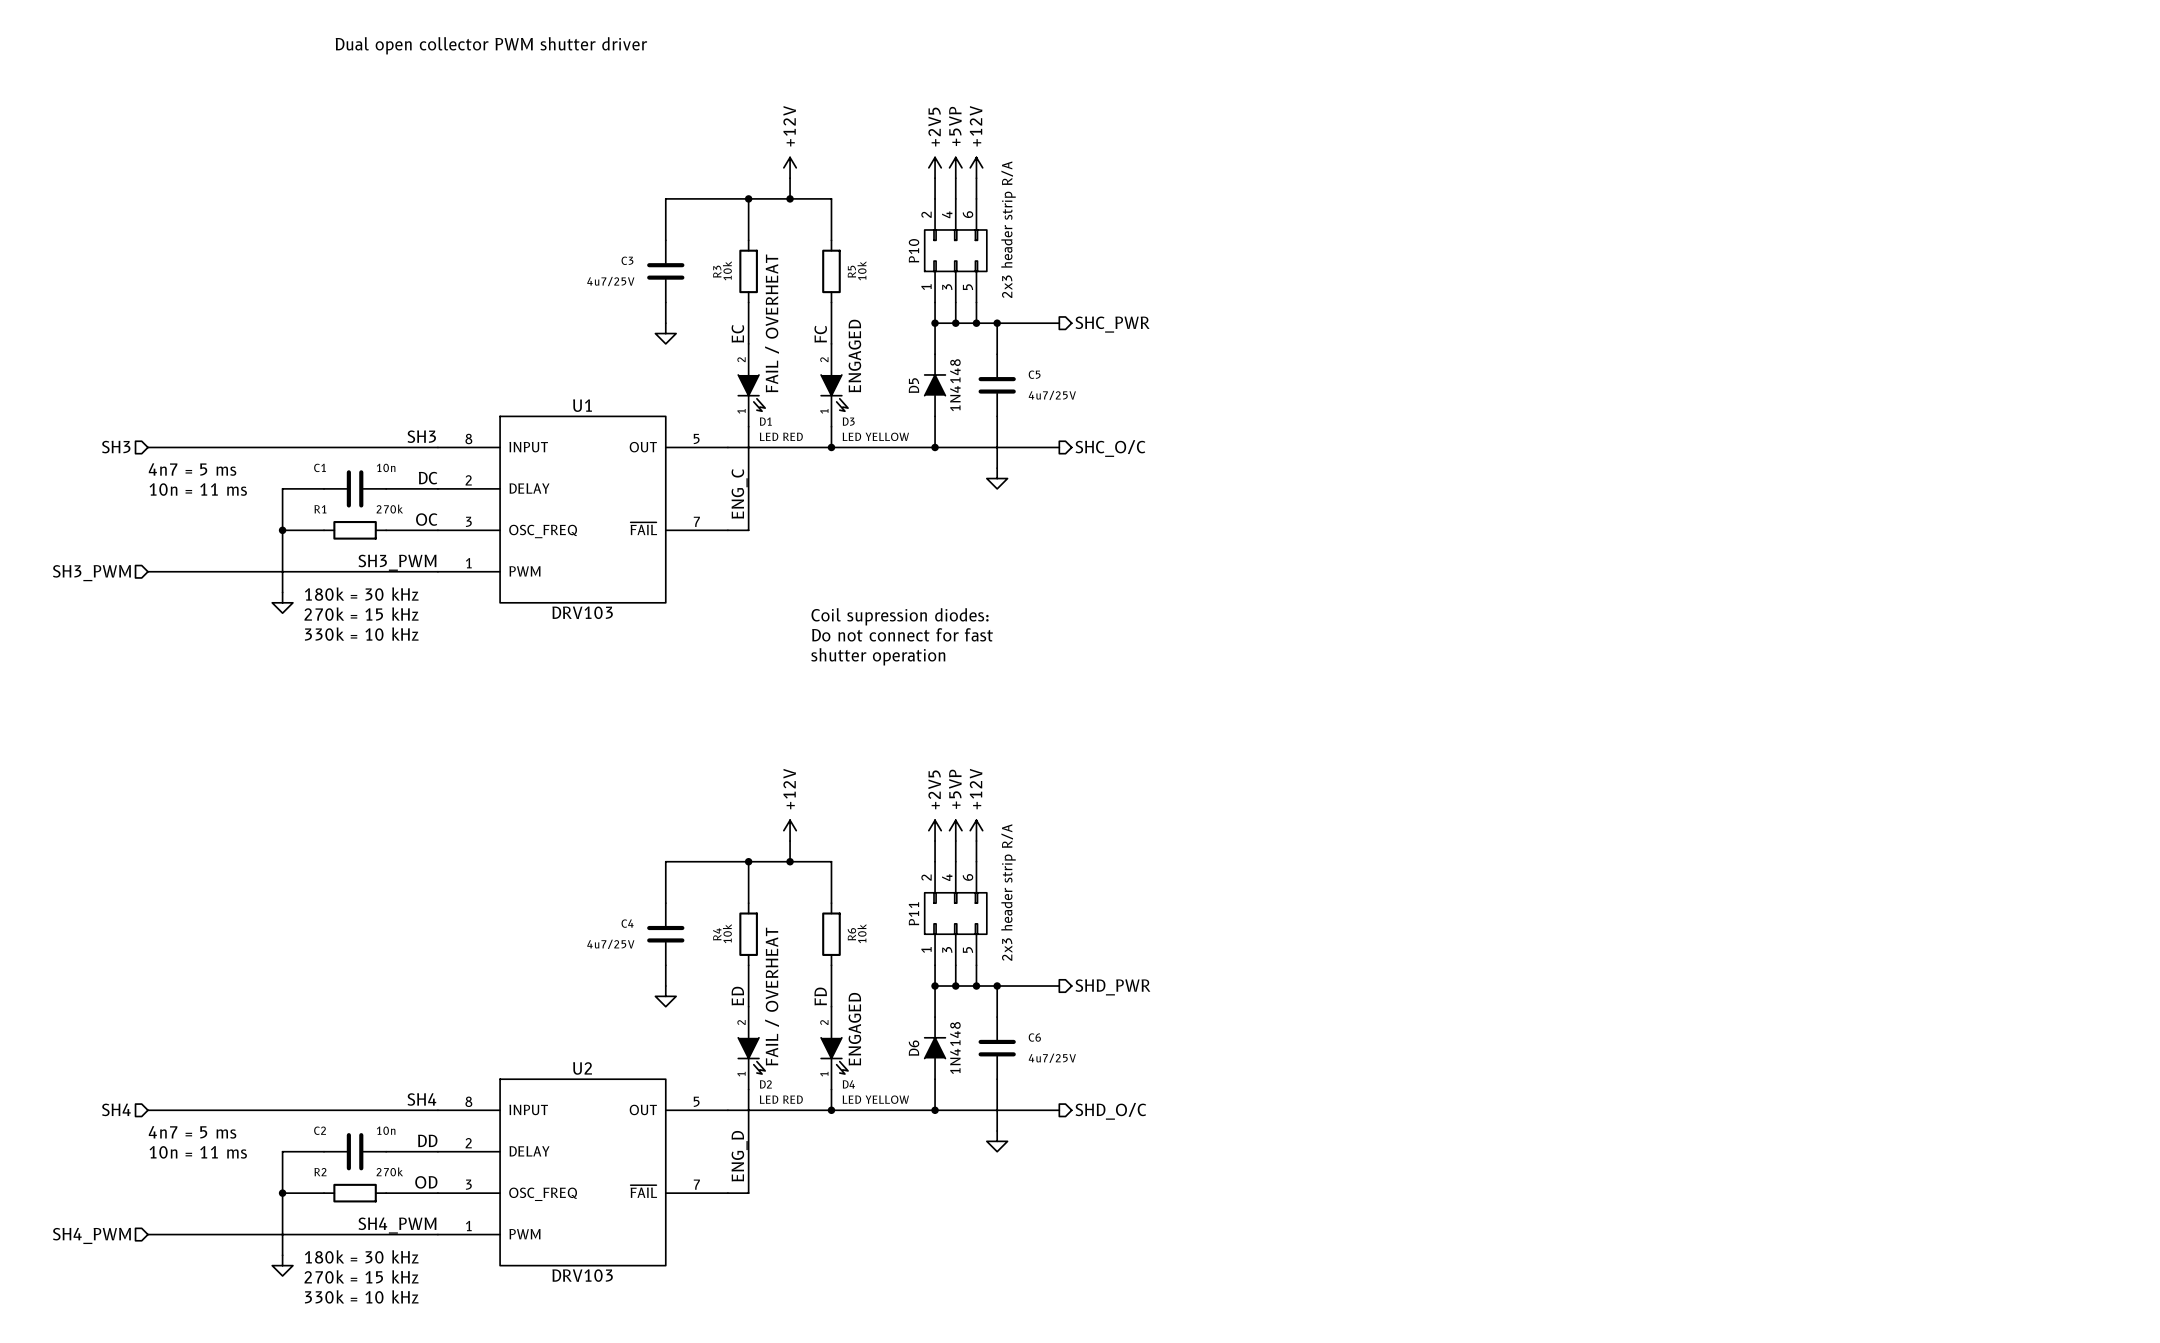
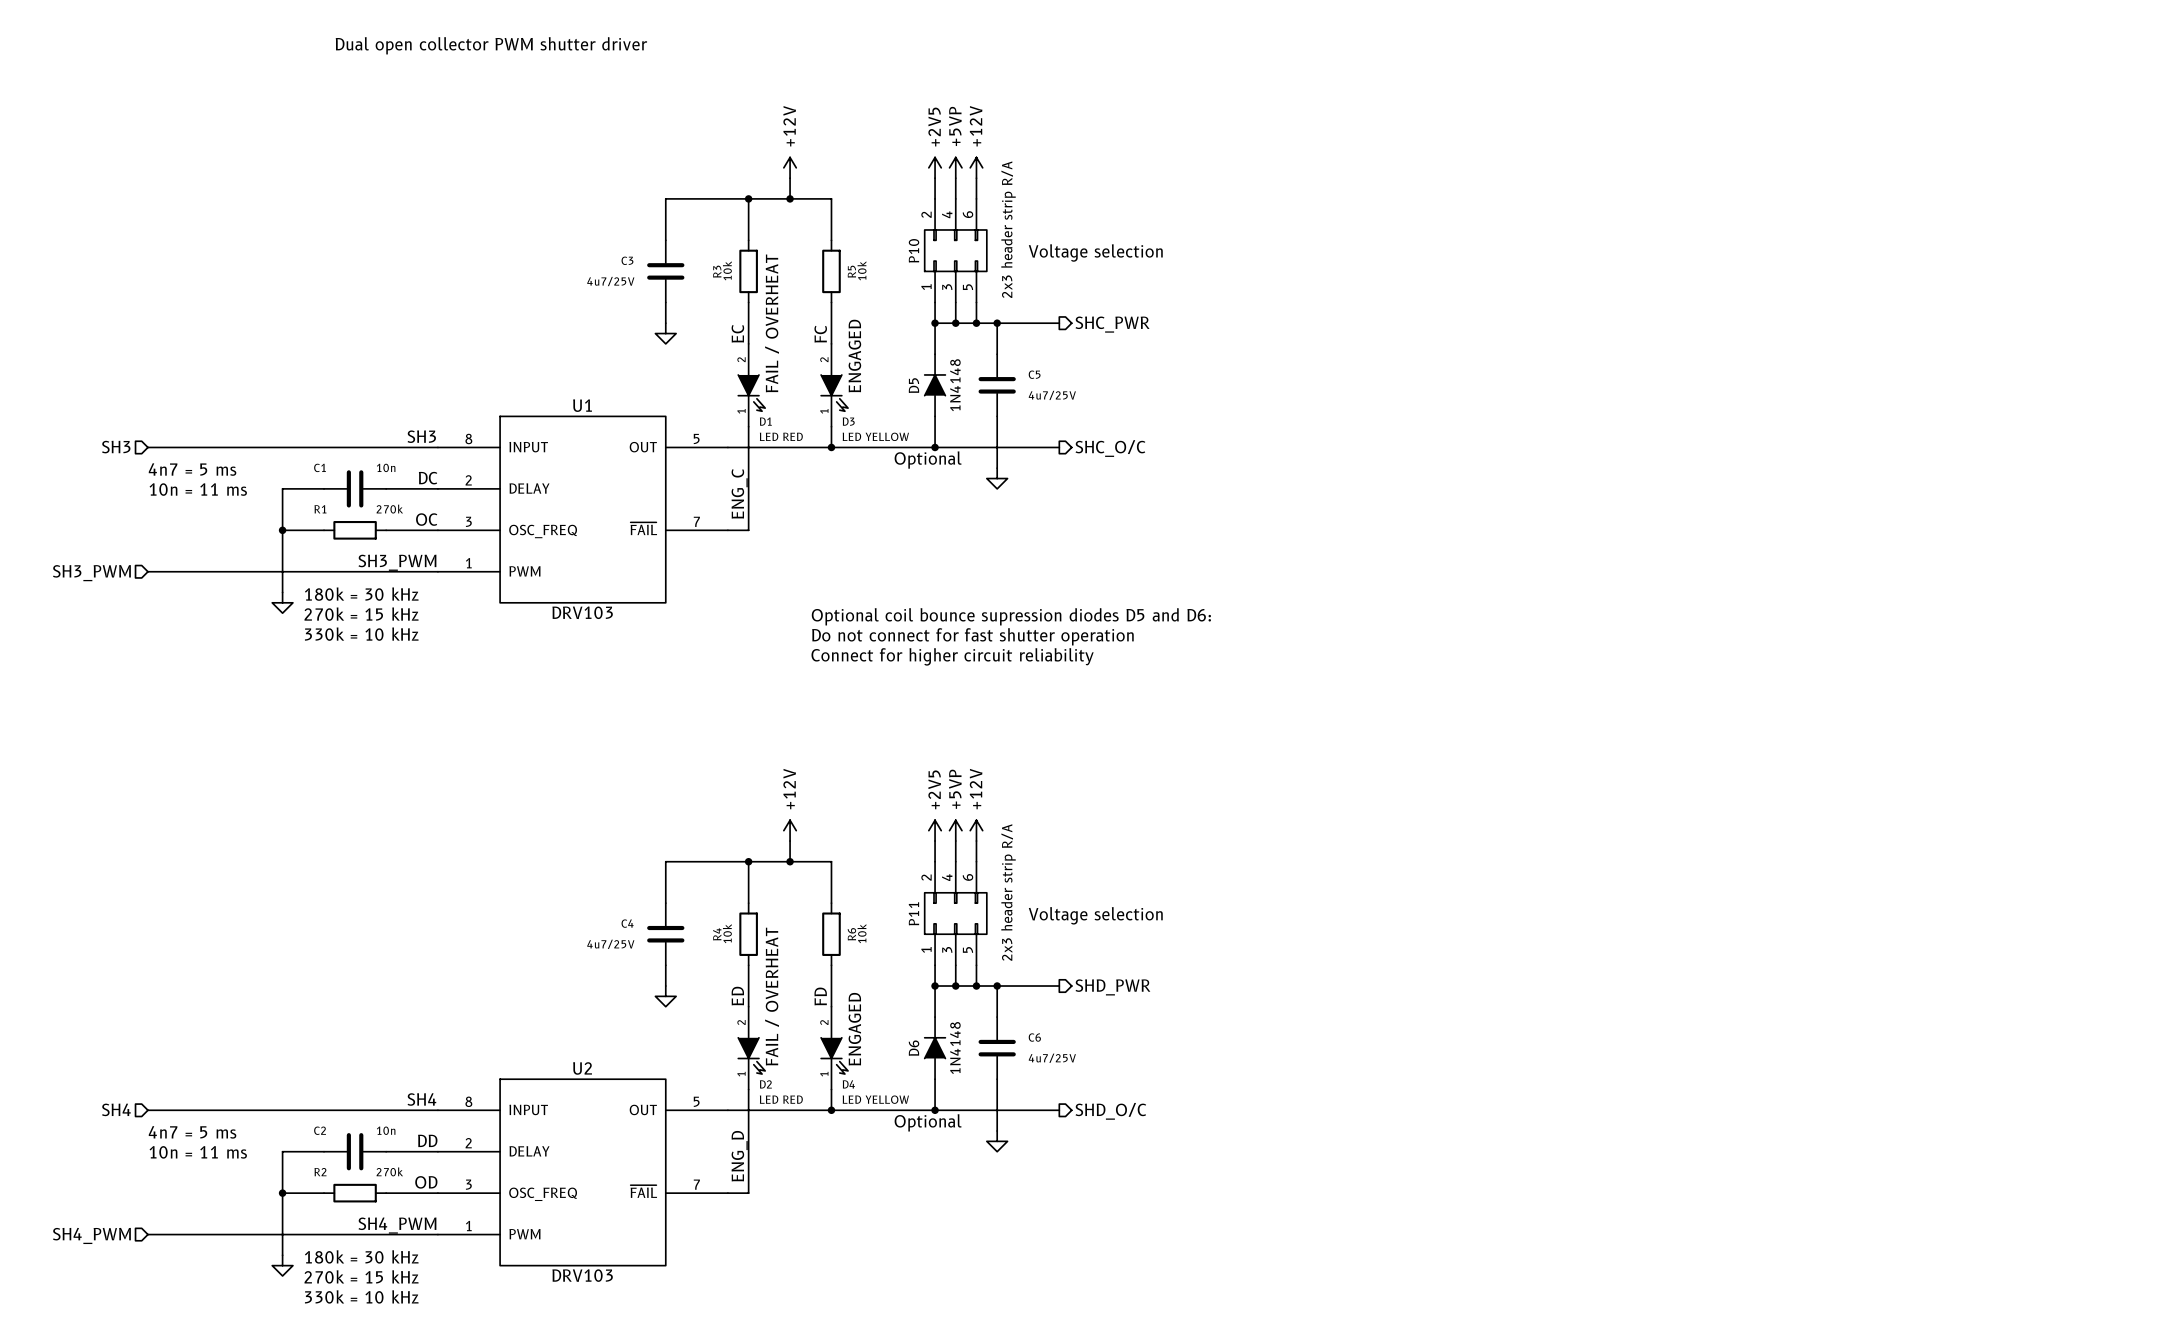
text: none -> Voltage selection (1095, 252)
text: none -> Optional (928, 460)
text: Coil supression diodes: (900, 616) -> Optional coil bounce supression diodes D5 and D6: (1011, 616)
text: Do not connect for fast (902, 634) -> Do not connect for fast shutter operation (972, 636)
text: shutter operation (878, 656) -> Connect for higher circuit reliability (952, 656)
text: none -> Voltage selection (1095, 915)
text: none -> Optional (928, 1122)

